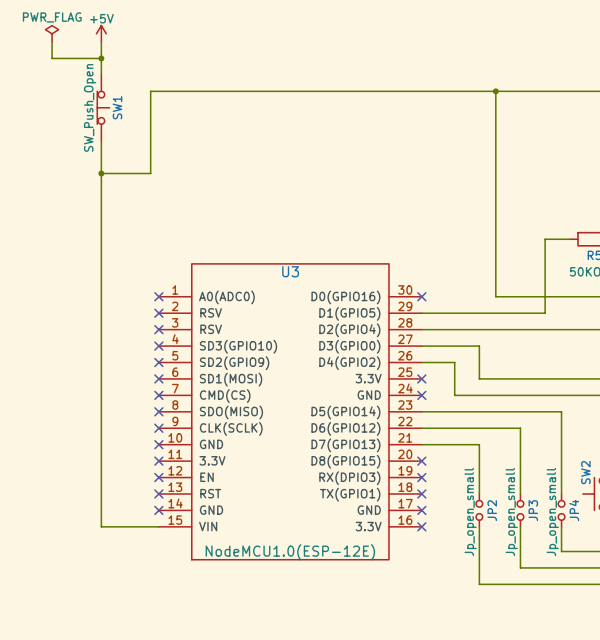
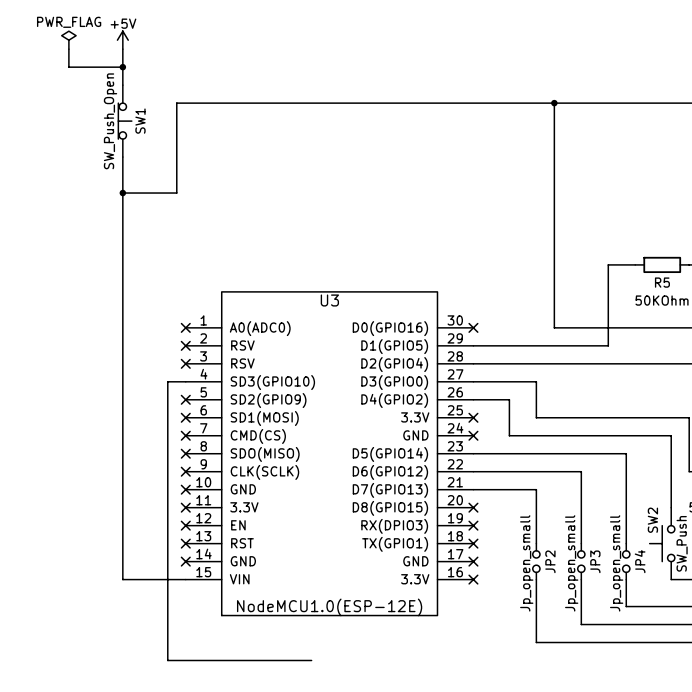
wire: none -> (185, 381) (167, 381) (167, 660) (311, 660)
no-connect mark: (158, 346) -> none

